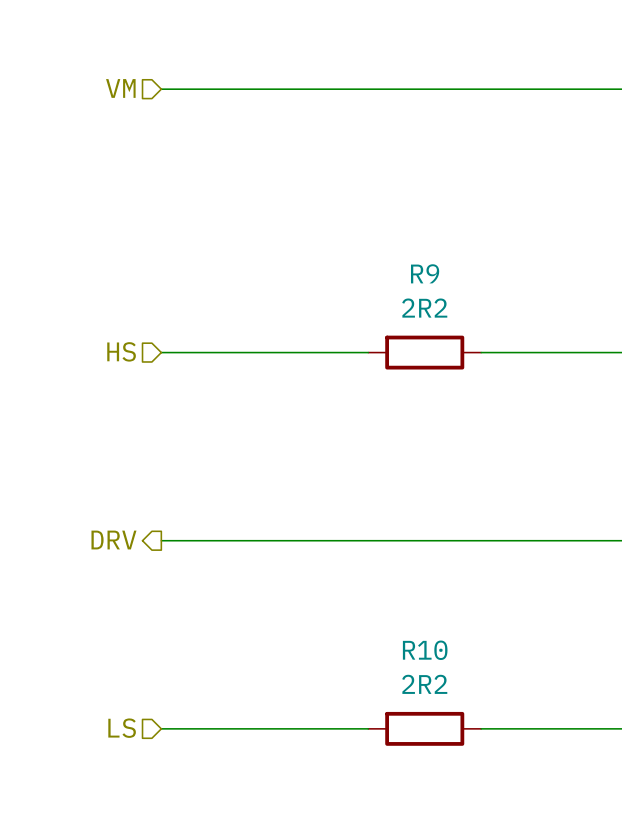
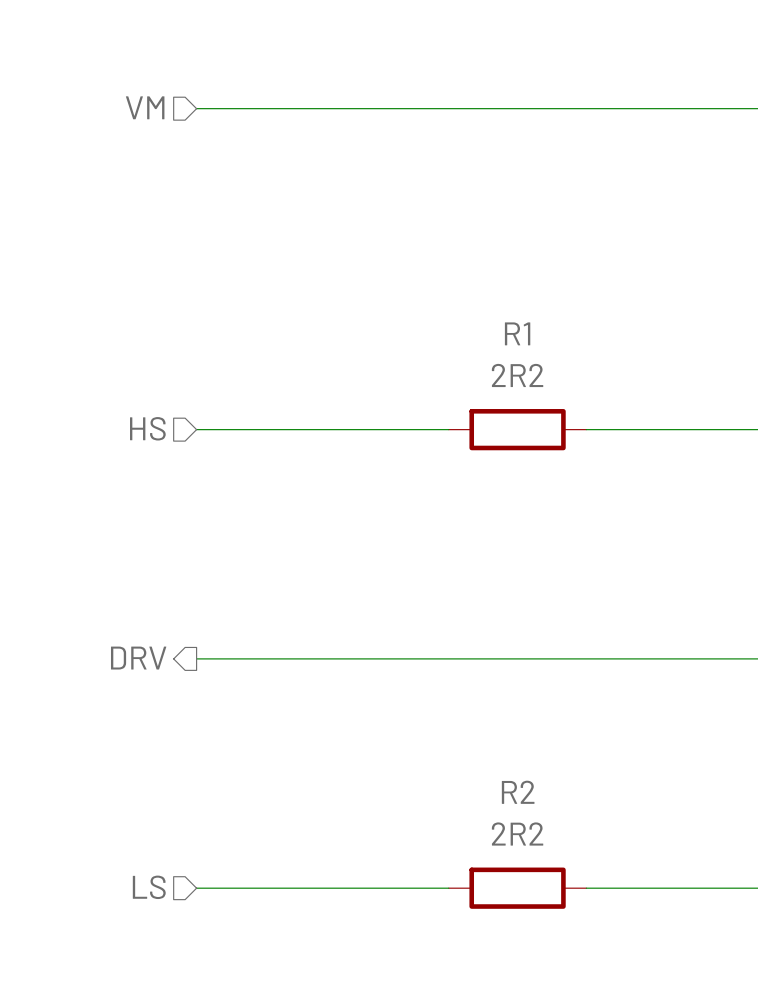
R9 name: R9 (425, 273) -> R1 (517, 333)
R10 name: R10 (425, 650) -> R2 (518, 792)

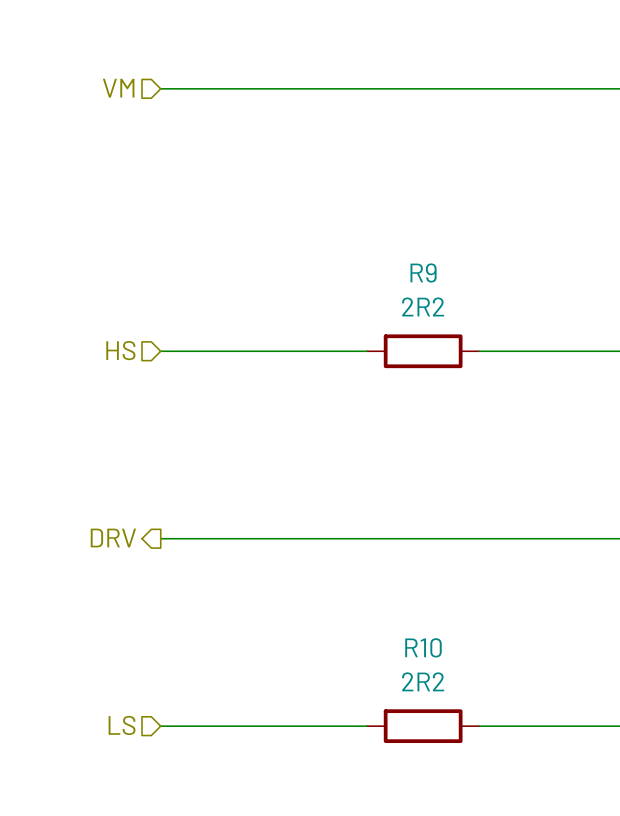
R1 name: R1 (517, 333) -> R9 (423, 272)
R2 name: R2 (518, 792) -> R10 (423, 647)

